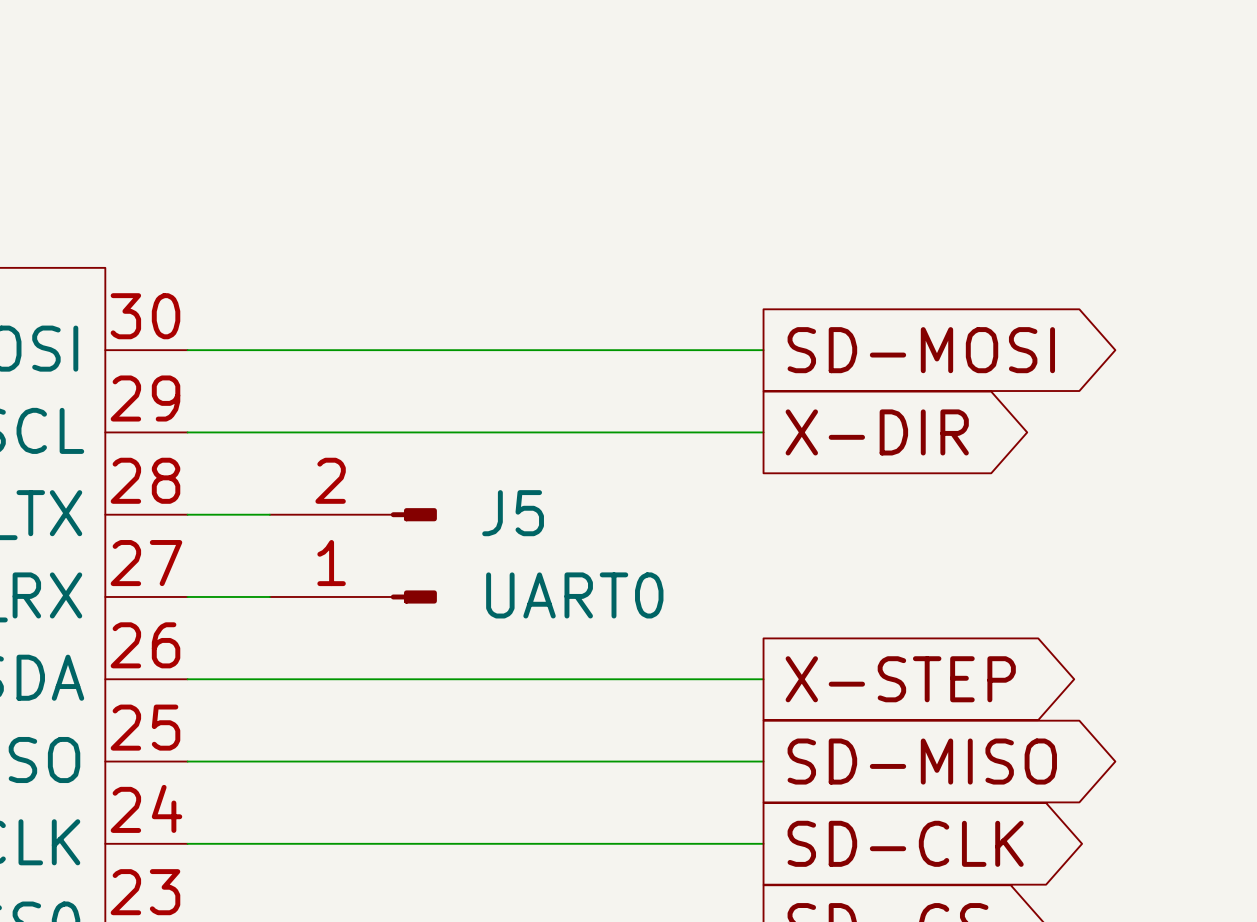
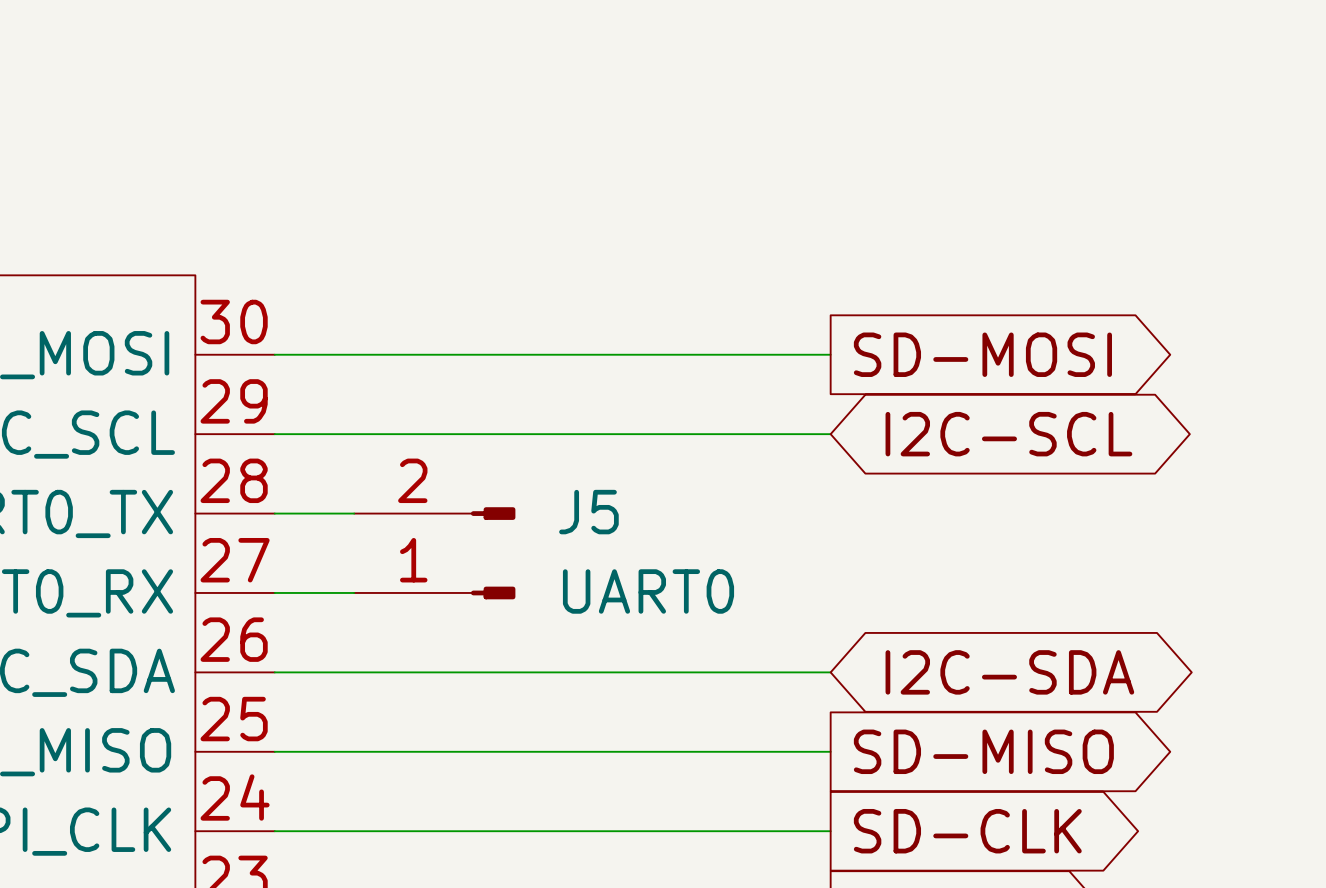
global label shape: output (877, 432) -> bidirectional (1008, 434)
global label: X-DIR (877, 432) -> I2C-SCL (1008, 434)
global label shape: output (900, 679) -> bidirectional (1009, 672)
global label: X-STEP (900, 679) -> I2C-SDA (1009, 672)

